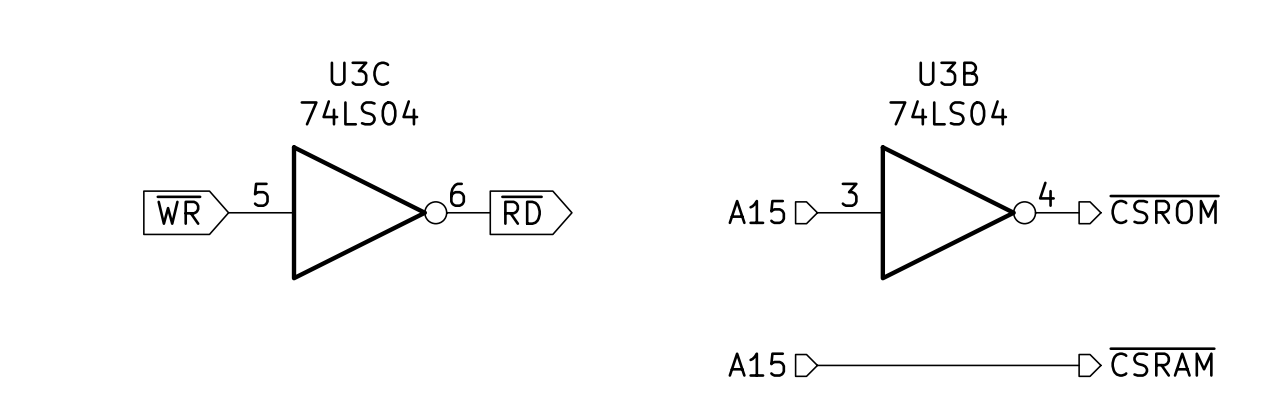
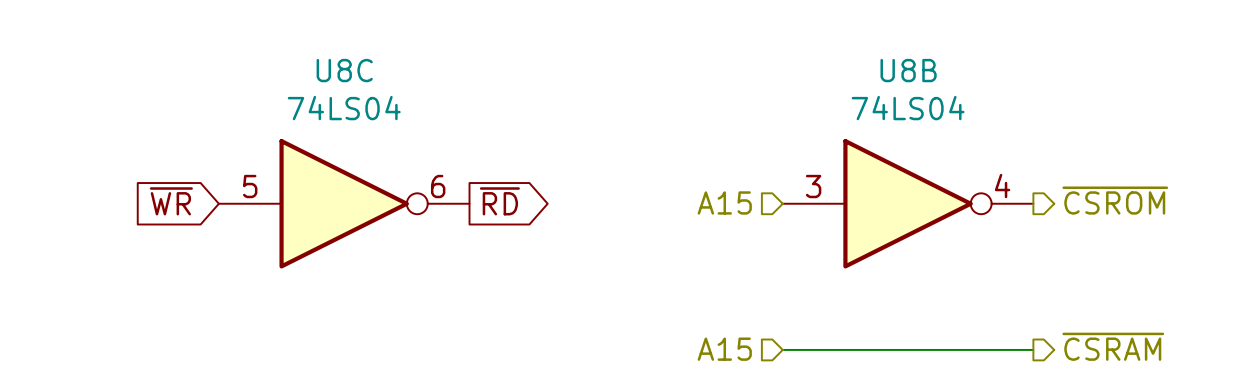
U3C name: U3C (359, 73) -> U8C (344, 70)
U3B name: U3B (948, 73) -> U8B (908, 70)

